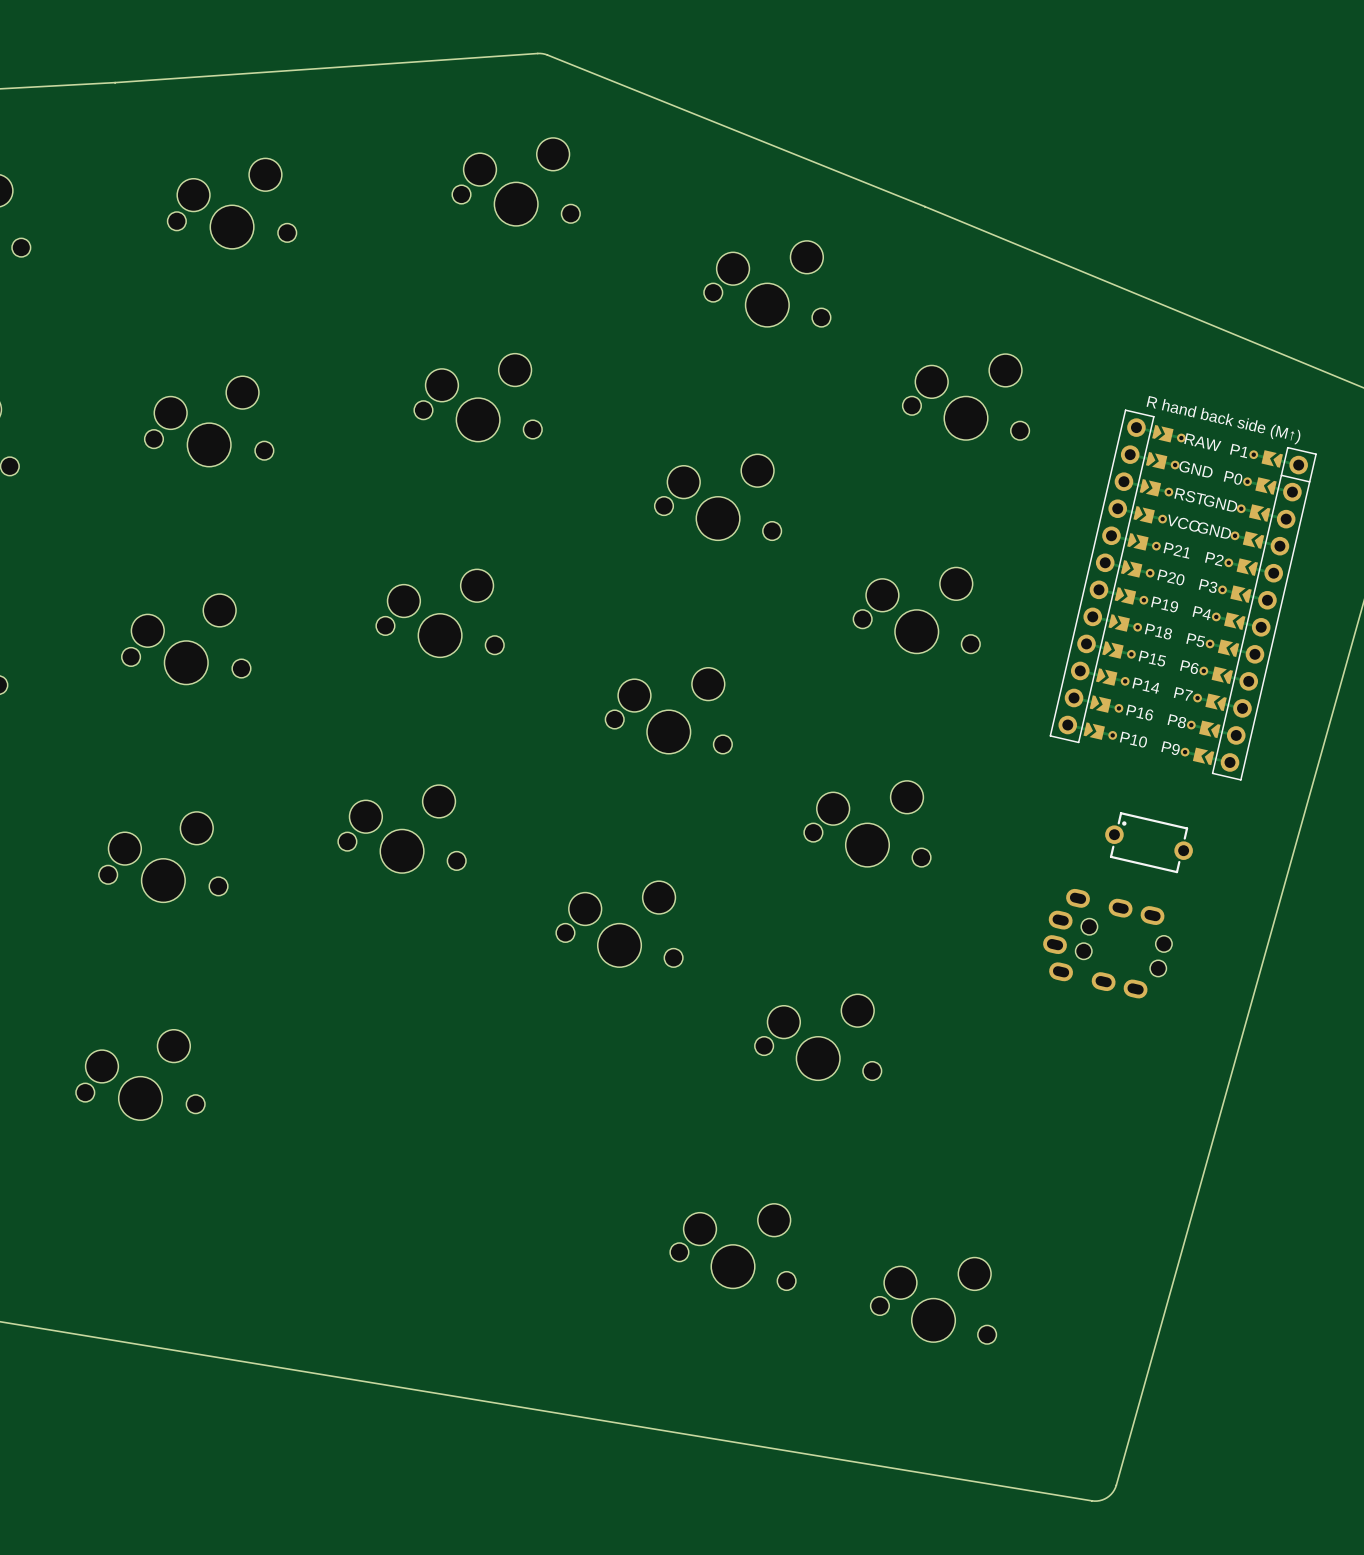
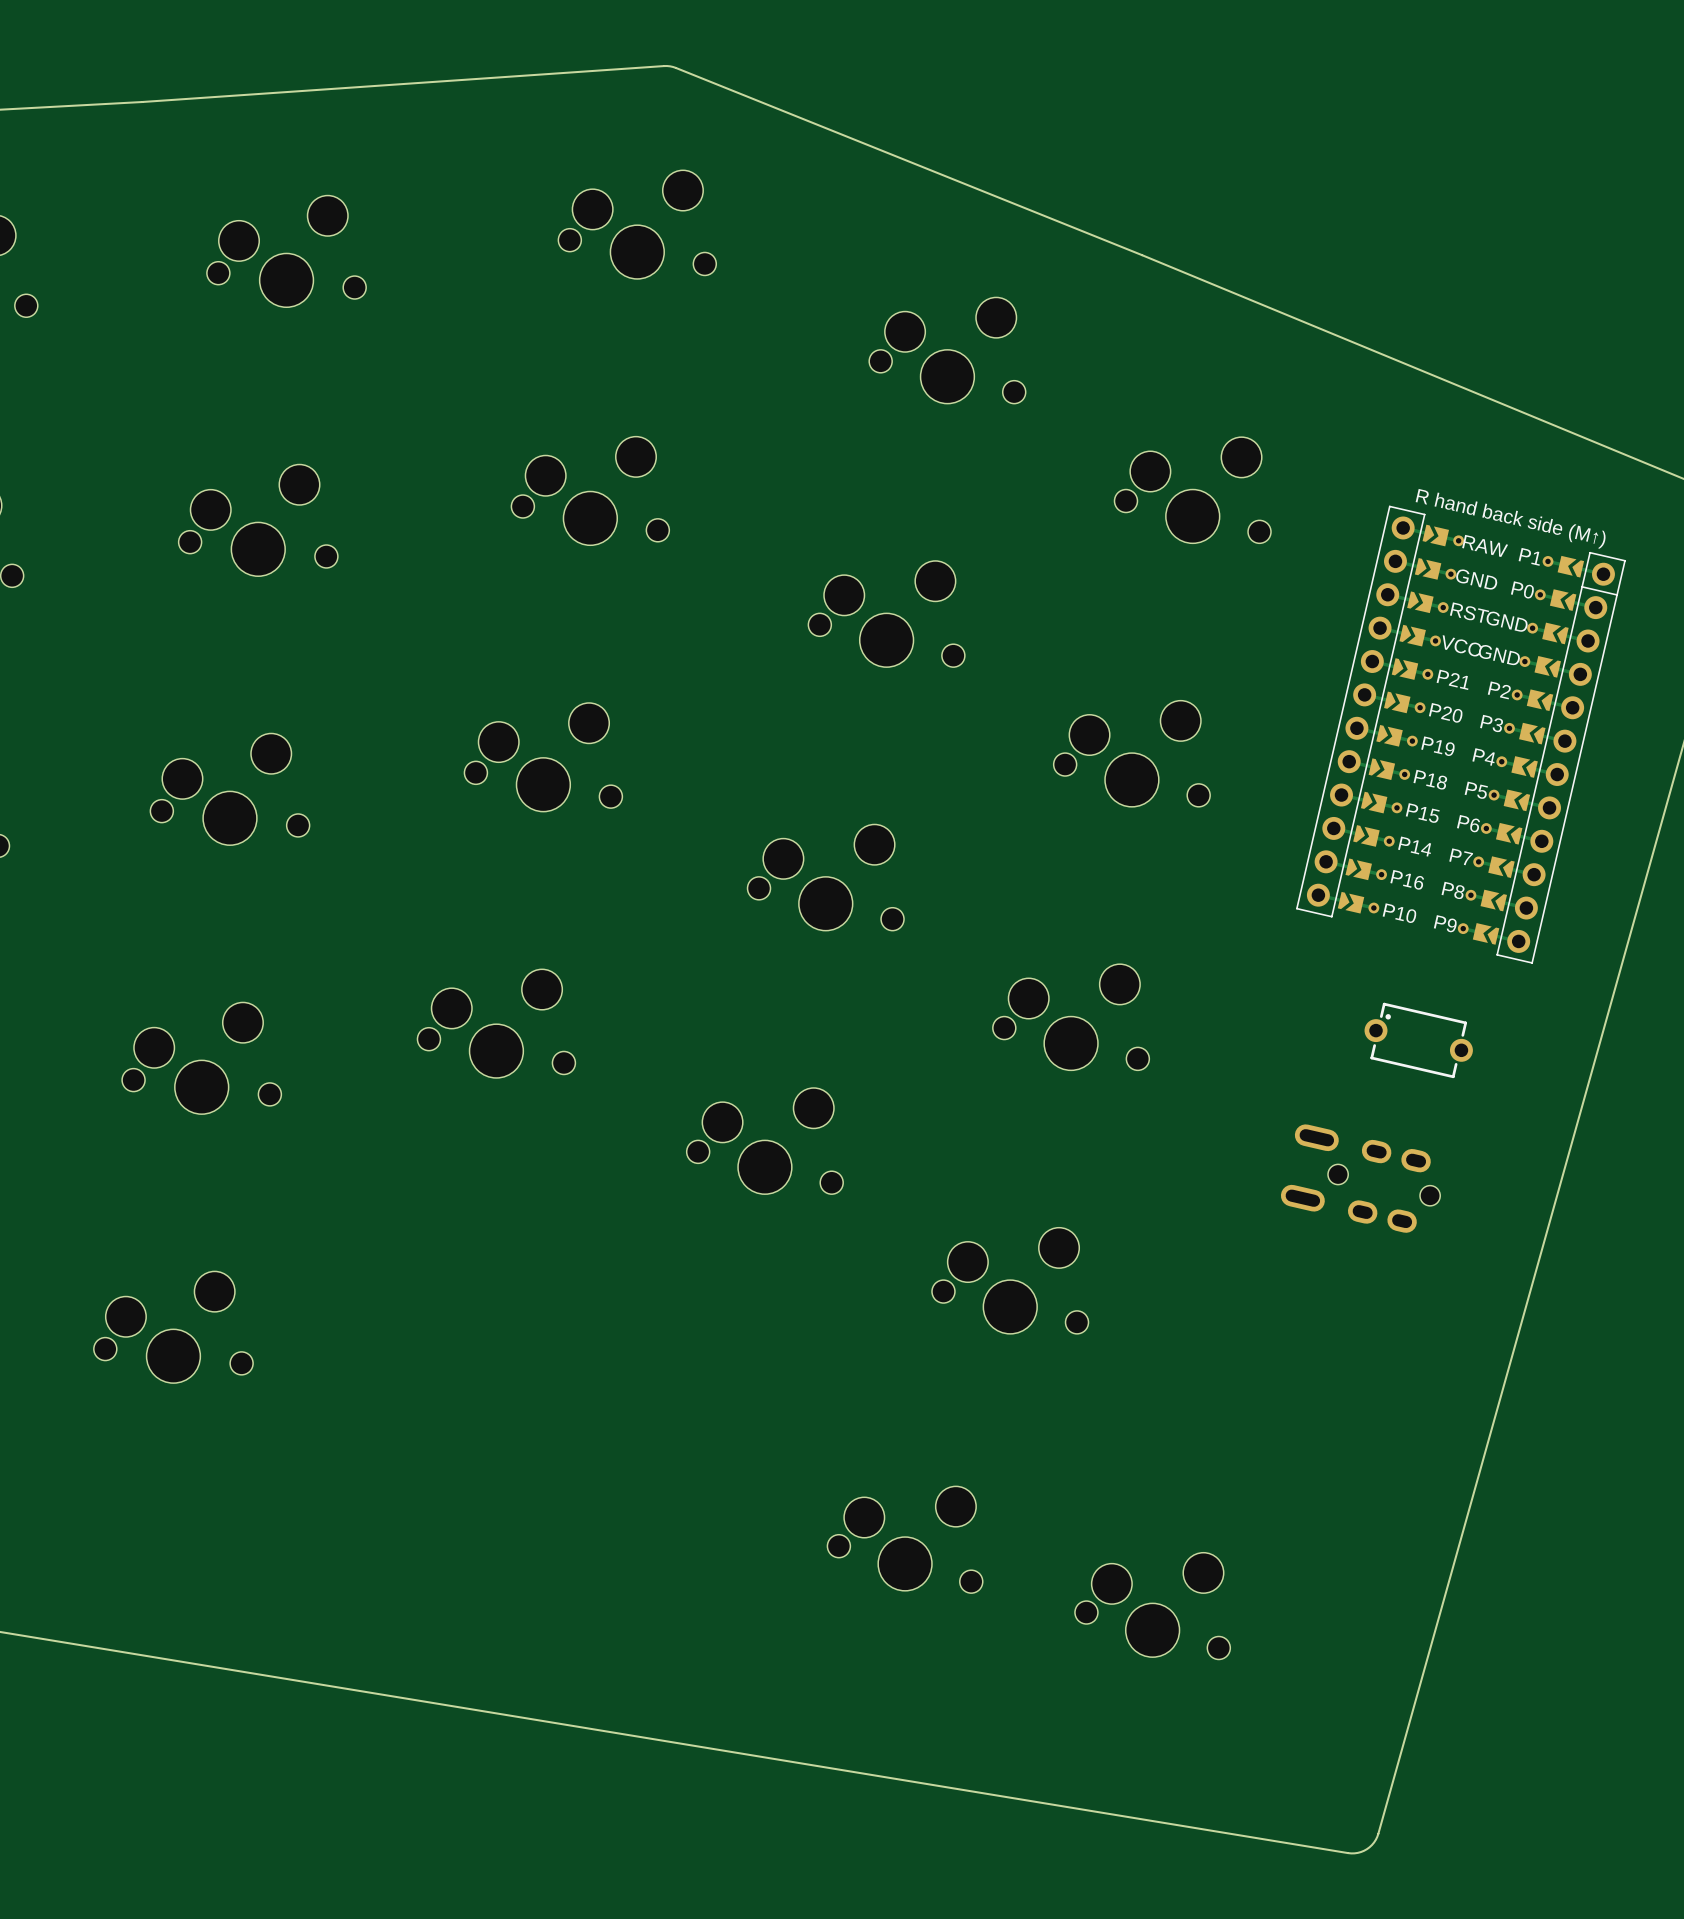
part: (1107, 943) -> none
part: none -> (1360, 1178)

